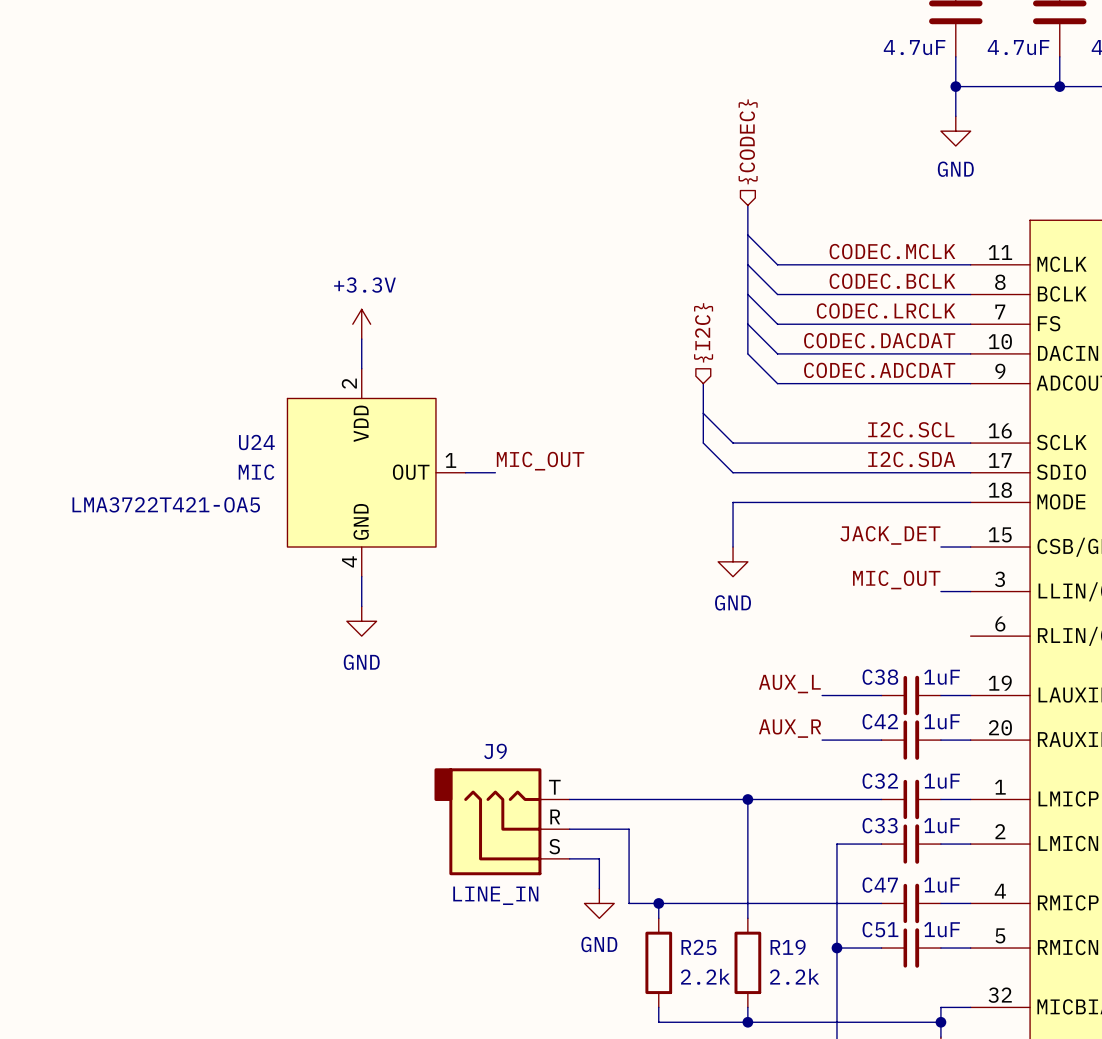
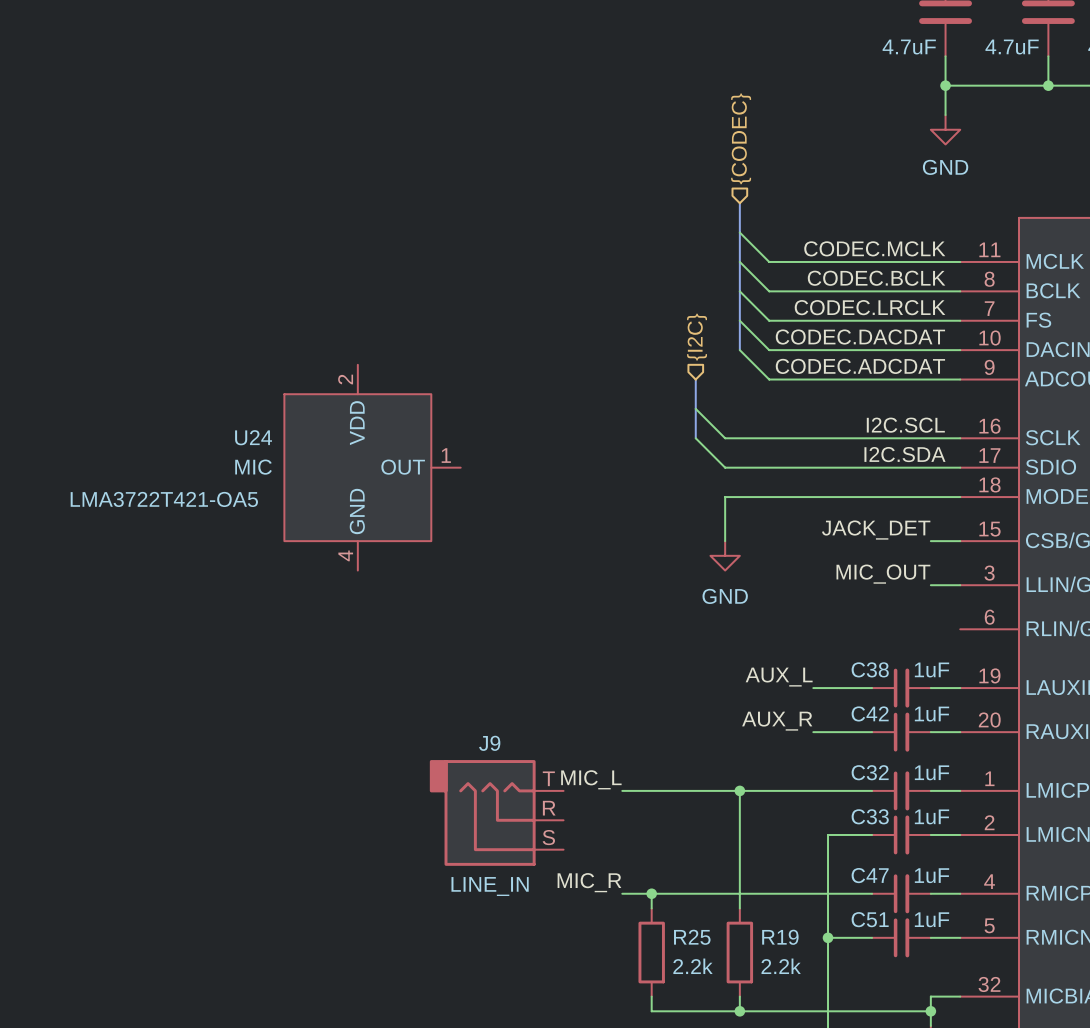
power symbol: +3.3V (361, 324) -> none
wire: (361, 339) (361, 368) -> none
label: MIC_OUT (540, 461) -> none
wire: (465, 472) (495, 472) -> none
wire: (361, 576) (361, 606) -> none
power symbol: GND (361, 621) -> none
label: none -> MIC_L (591, 779)
wire: (569, 799) (629, 799) -> none
wire: (569, 829) (629, 829) (629, 903) -> none
wire: (569, 858) (599, 858) (599, 888) -> none
label: none -> MIC_R (589, 882)
power symbol: GND (599, 903) -> none

